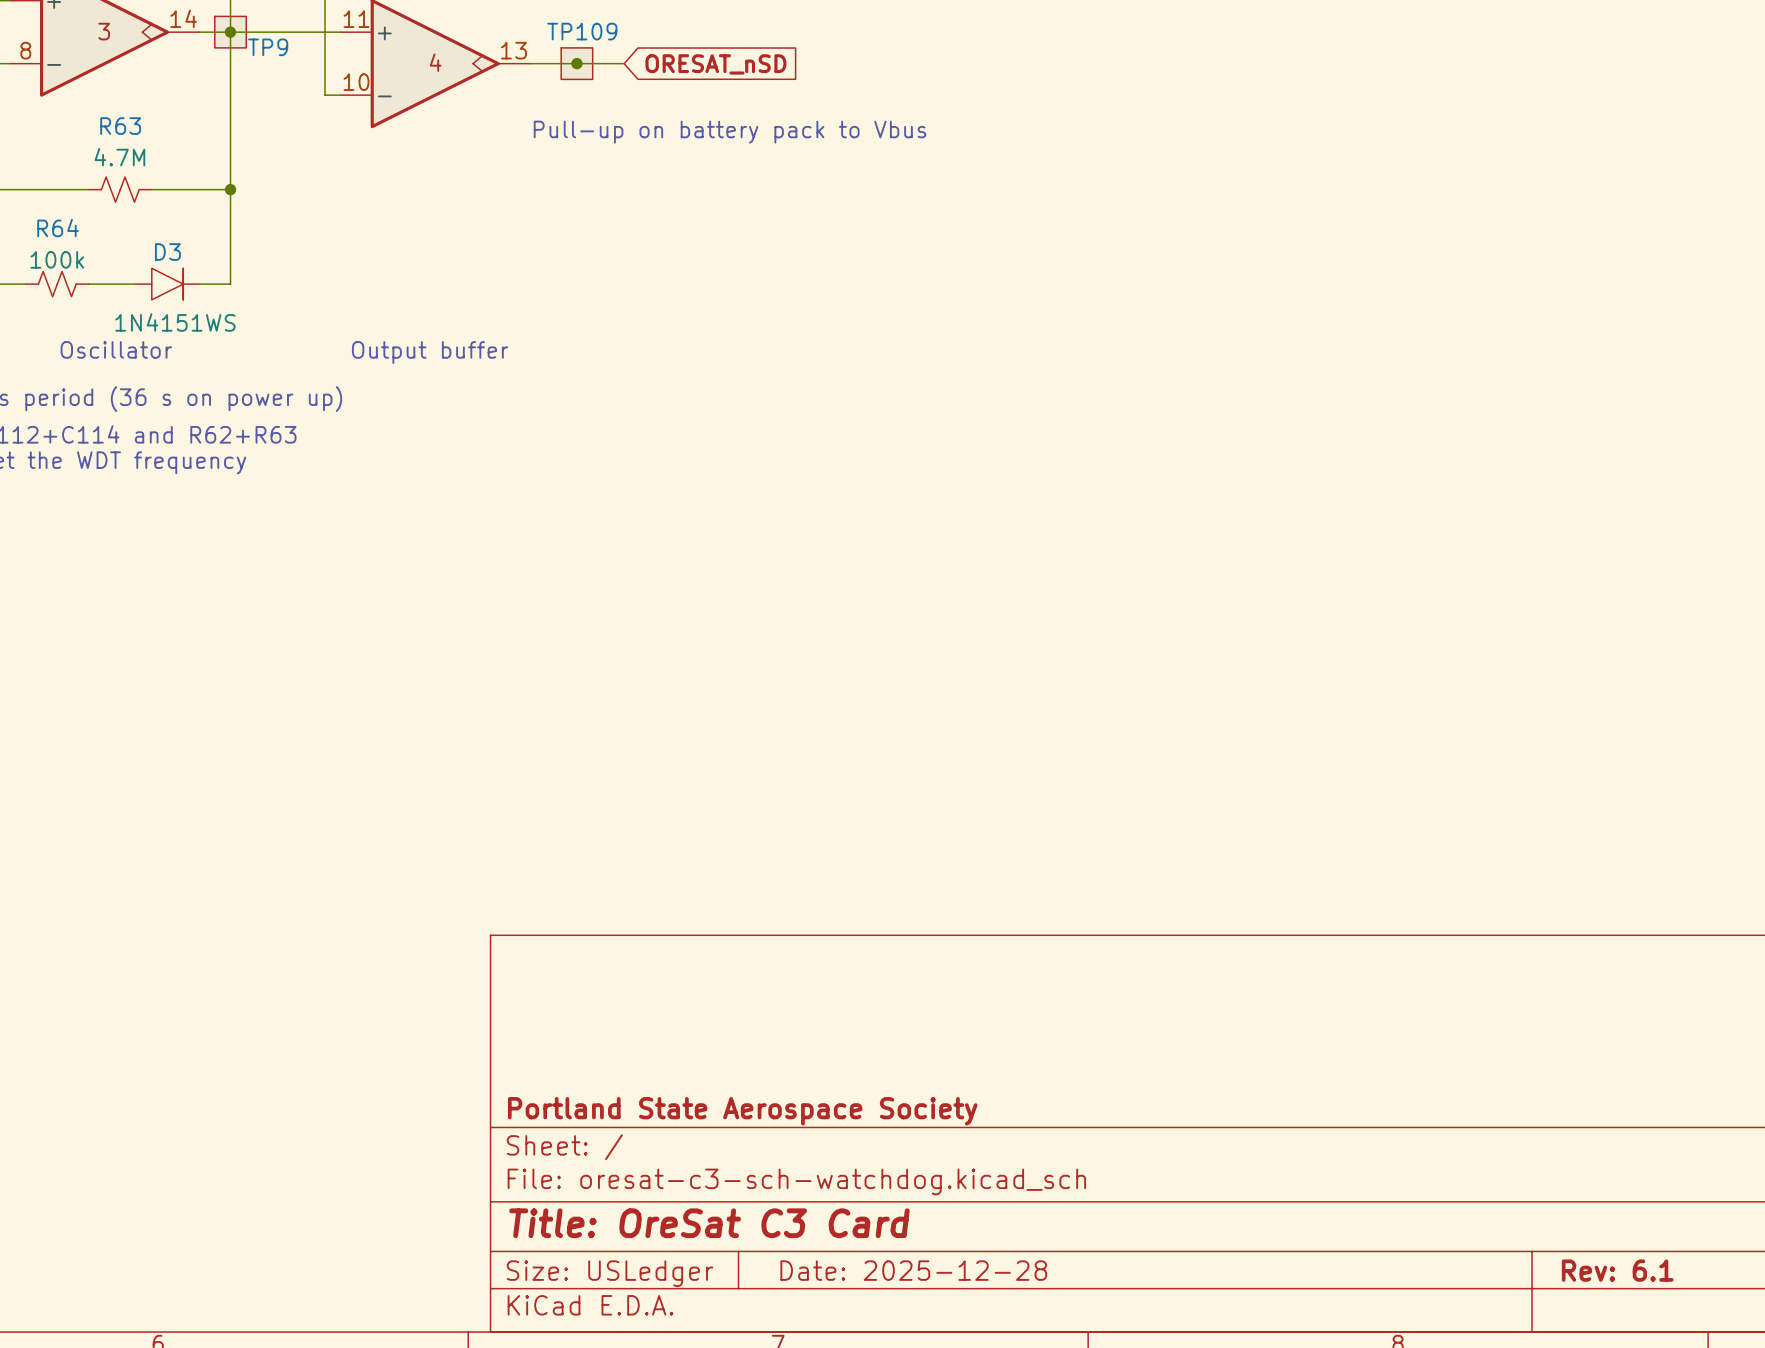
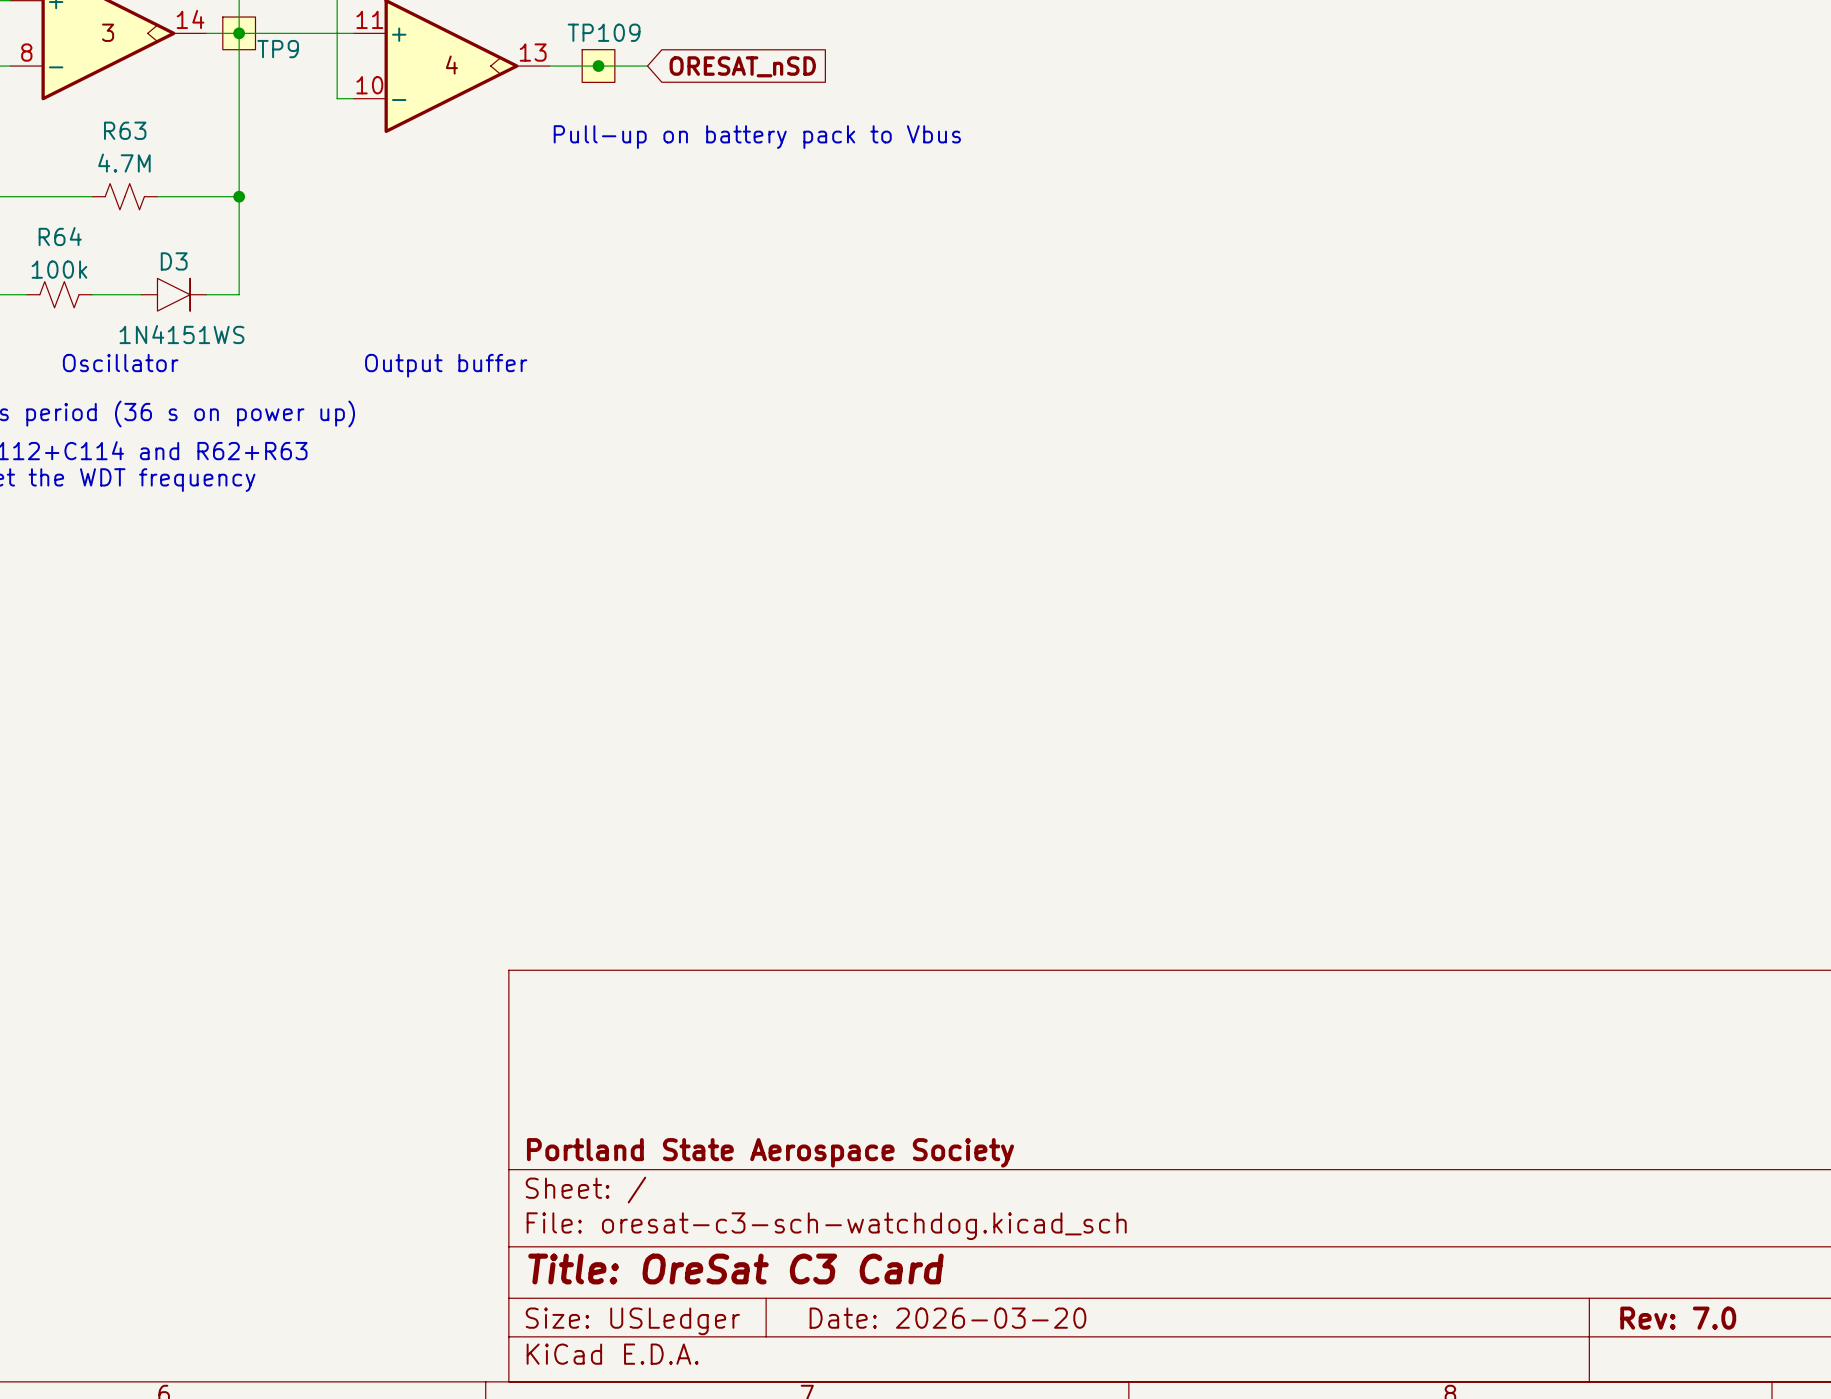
title block: Date: 2025-12-28 (913, 1270) -> Date: 2026-03-20 (947, 1318)
title block: Rev: 6.1 (1617, 1270) -> Rev: 7.0 (1678, 1318)

